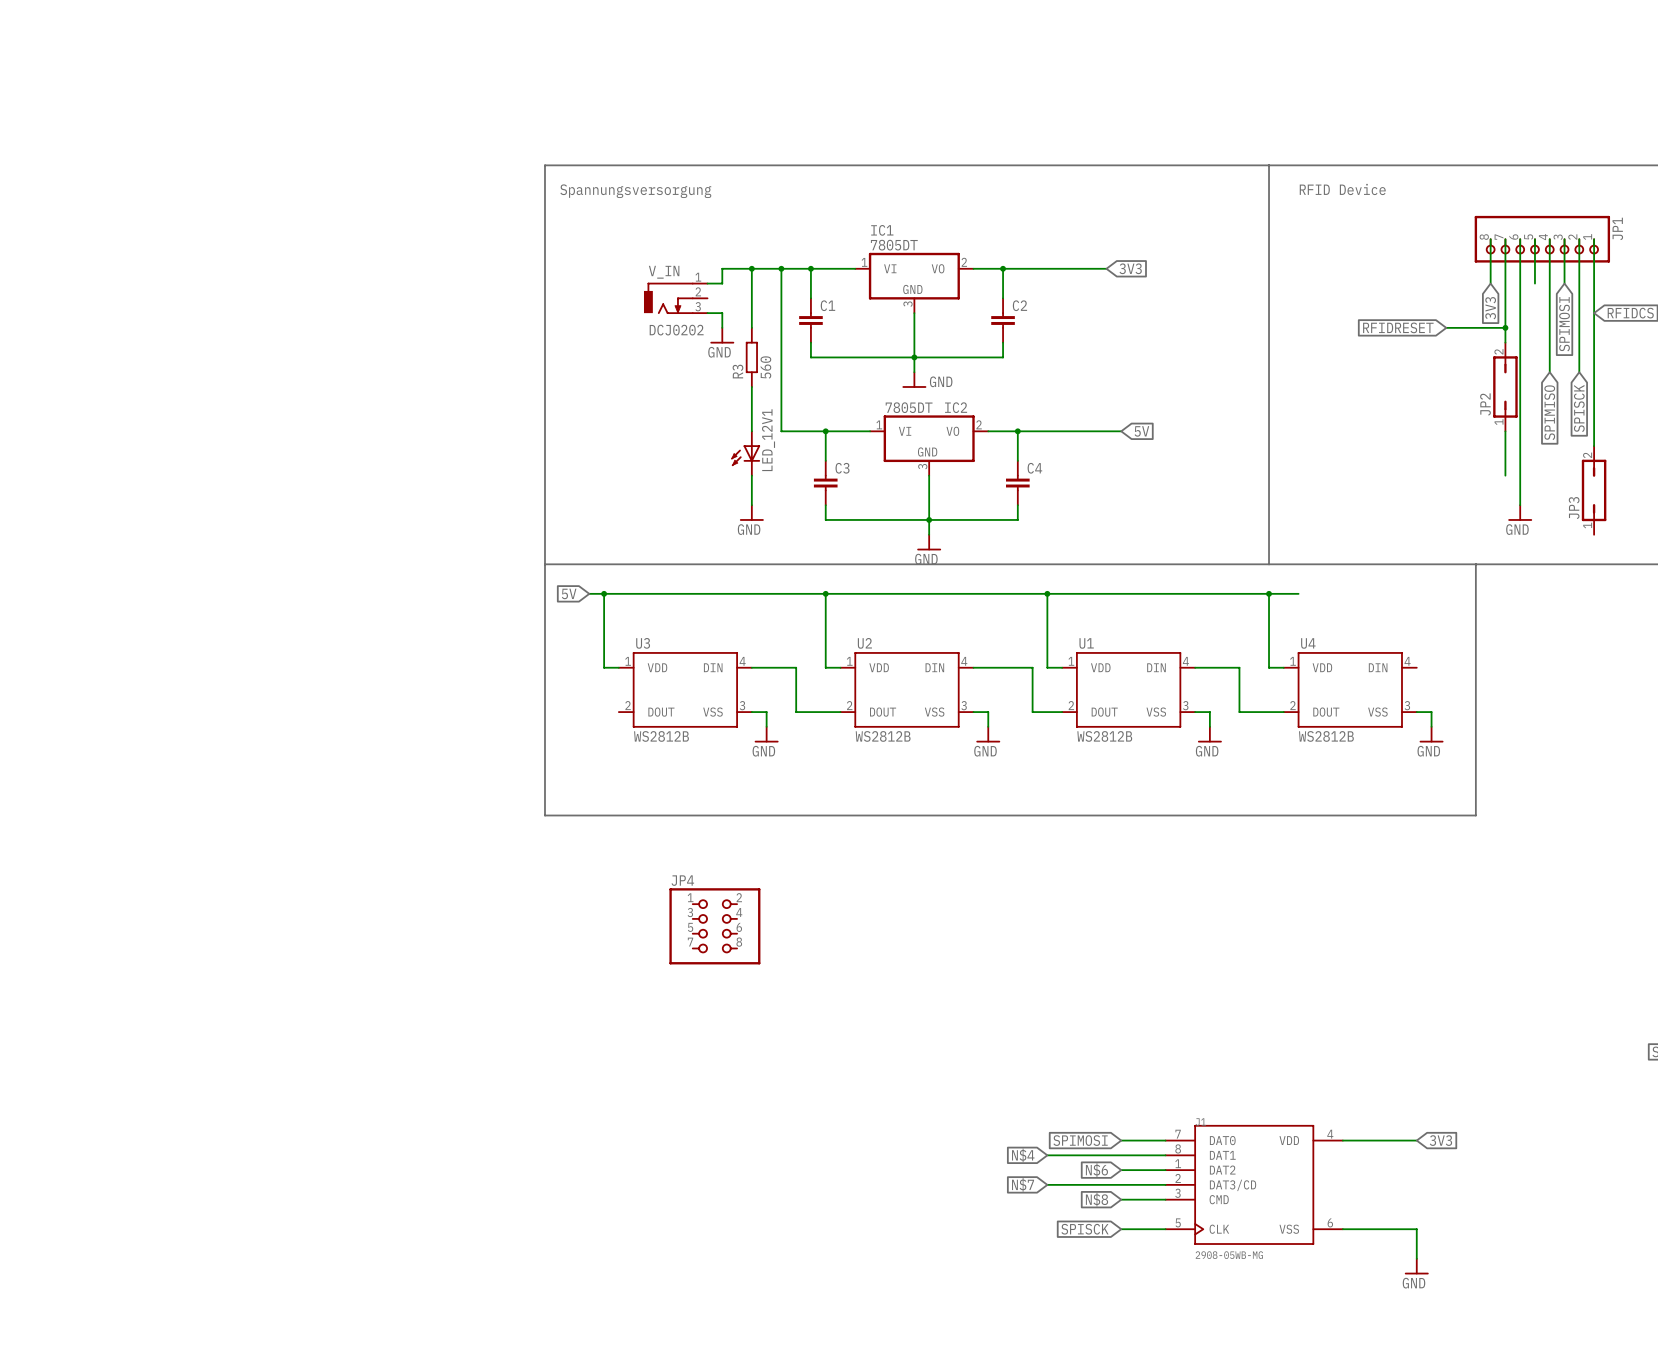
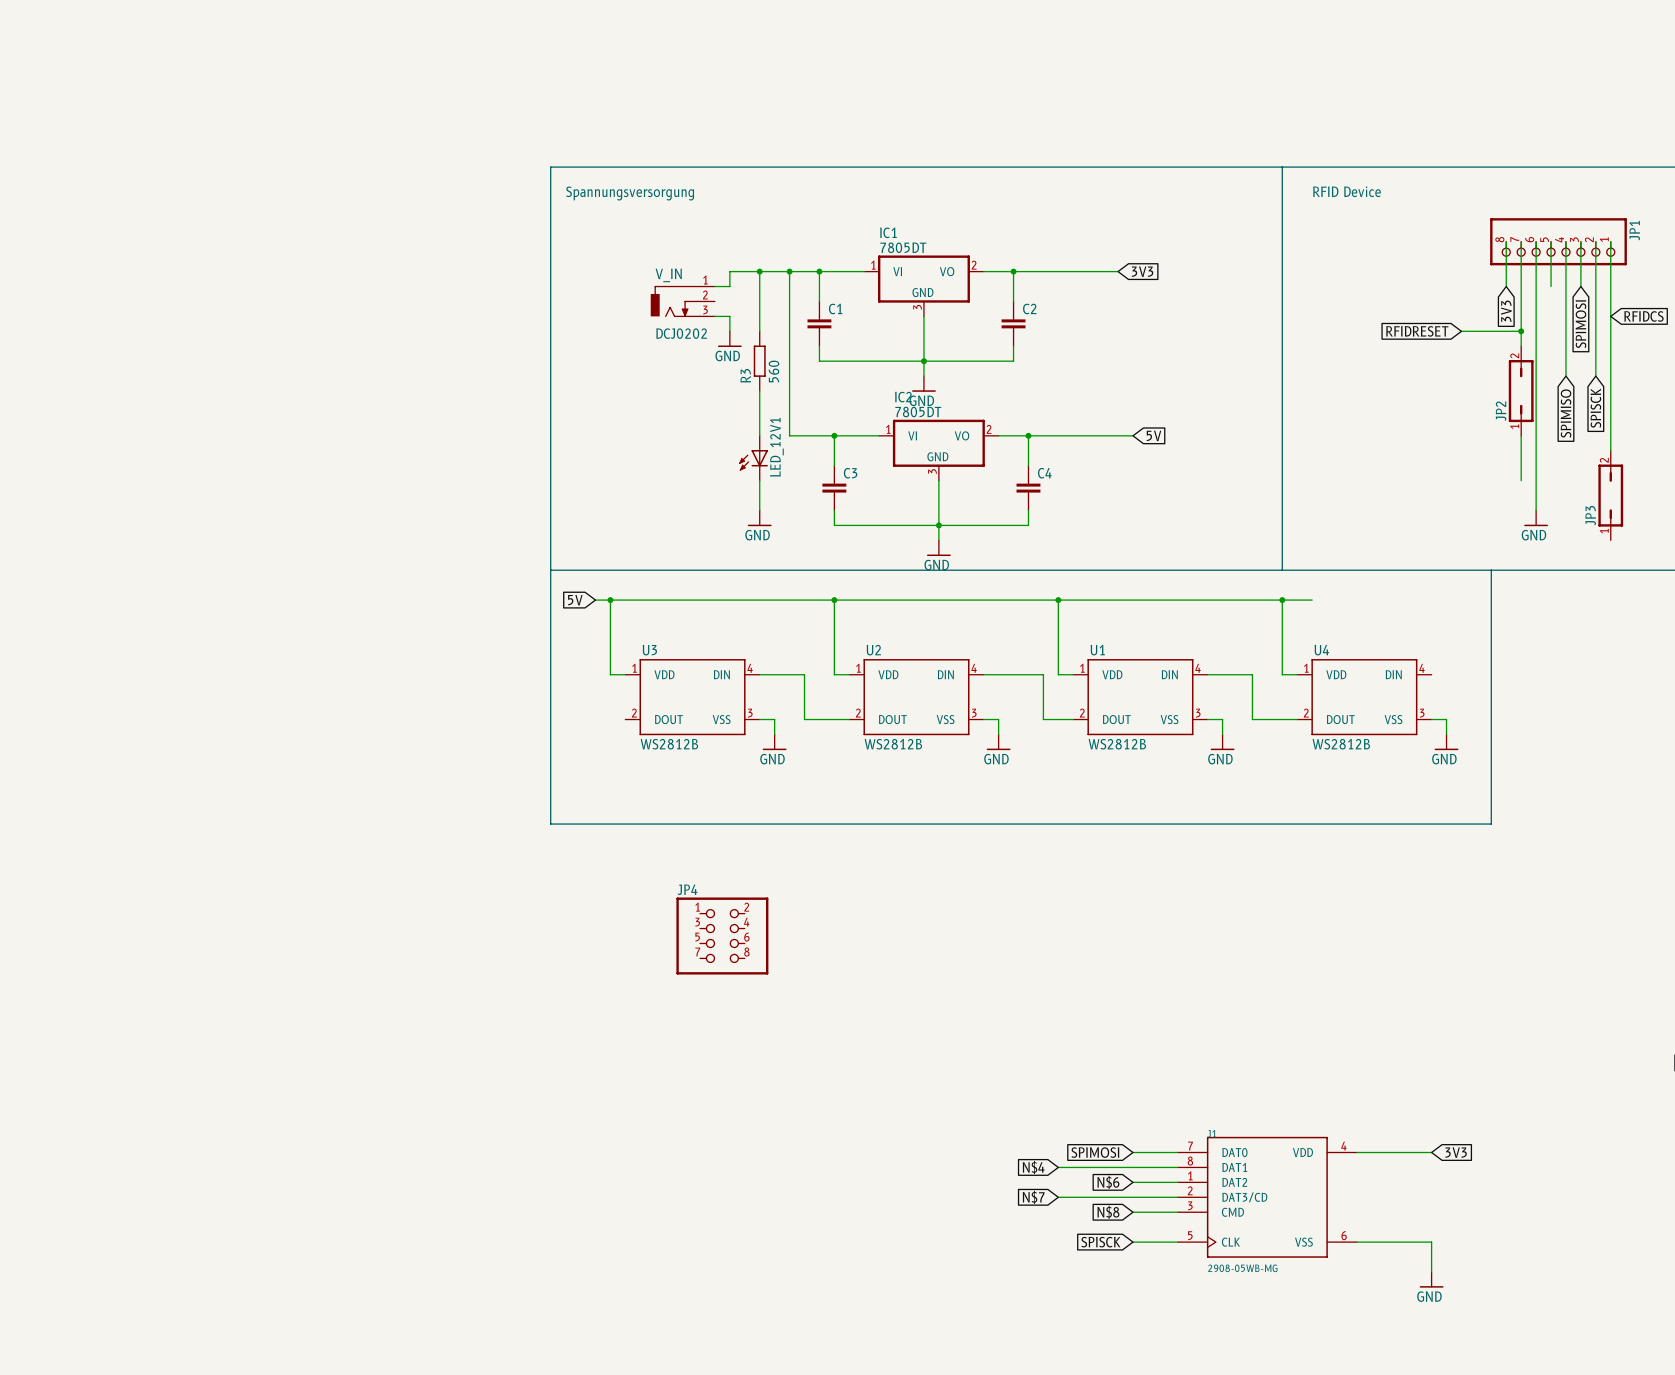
power symbol text position: GND (941, 381) -> GND (921, 400)
IC2 name position: IC2 (956, 407) -> IC2 (903, 397)

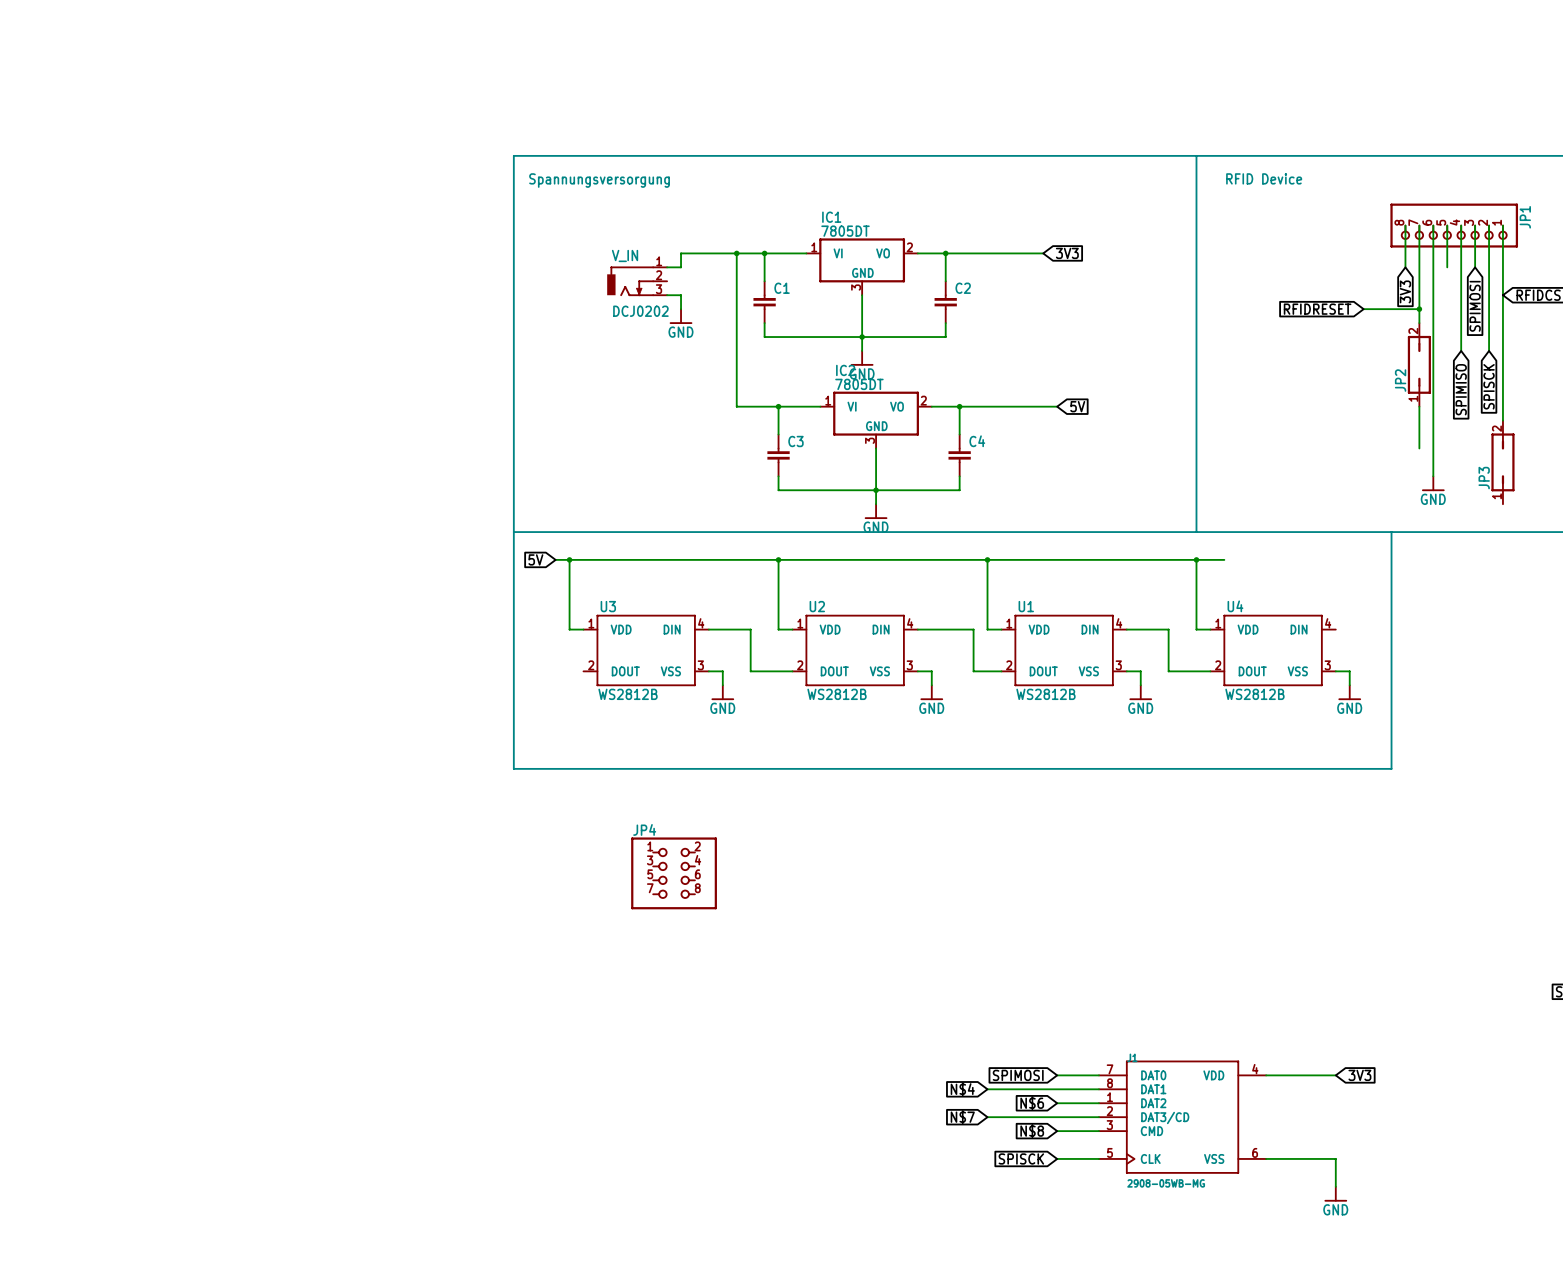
wire: (759, 271) (759, 331) -> none
junction: (759, 271) -> none
R3: 560 (759, 361) -> none
wire: (759, 391) (759, 435) -> none
LED_12V1: (753, 458) -> none
wire: (759, 480) (759, 510) -> none
power symbol: GND (759, 518) -> none

